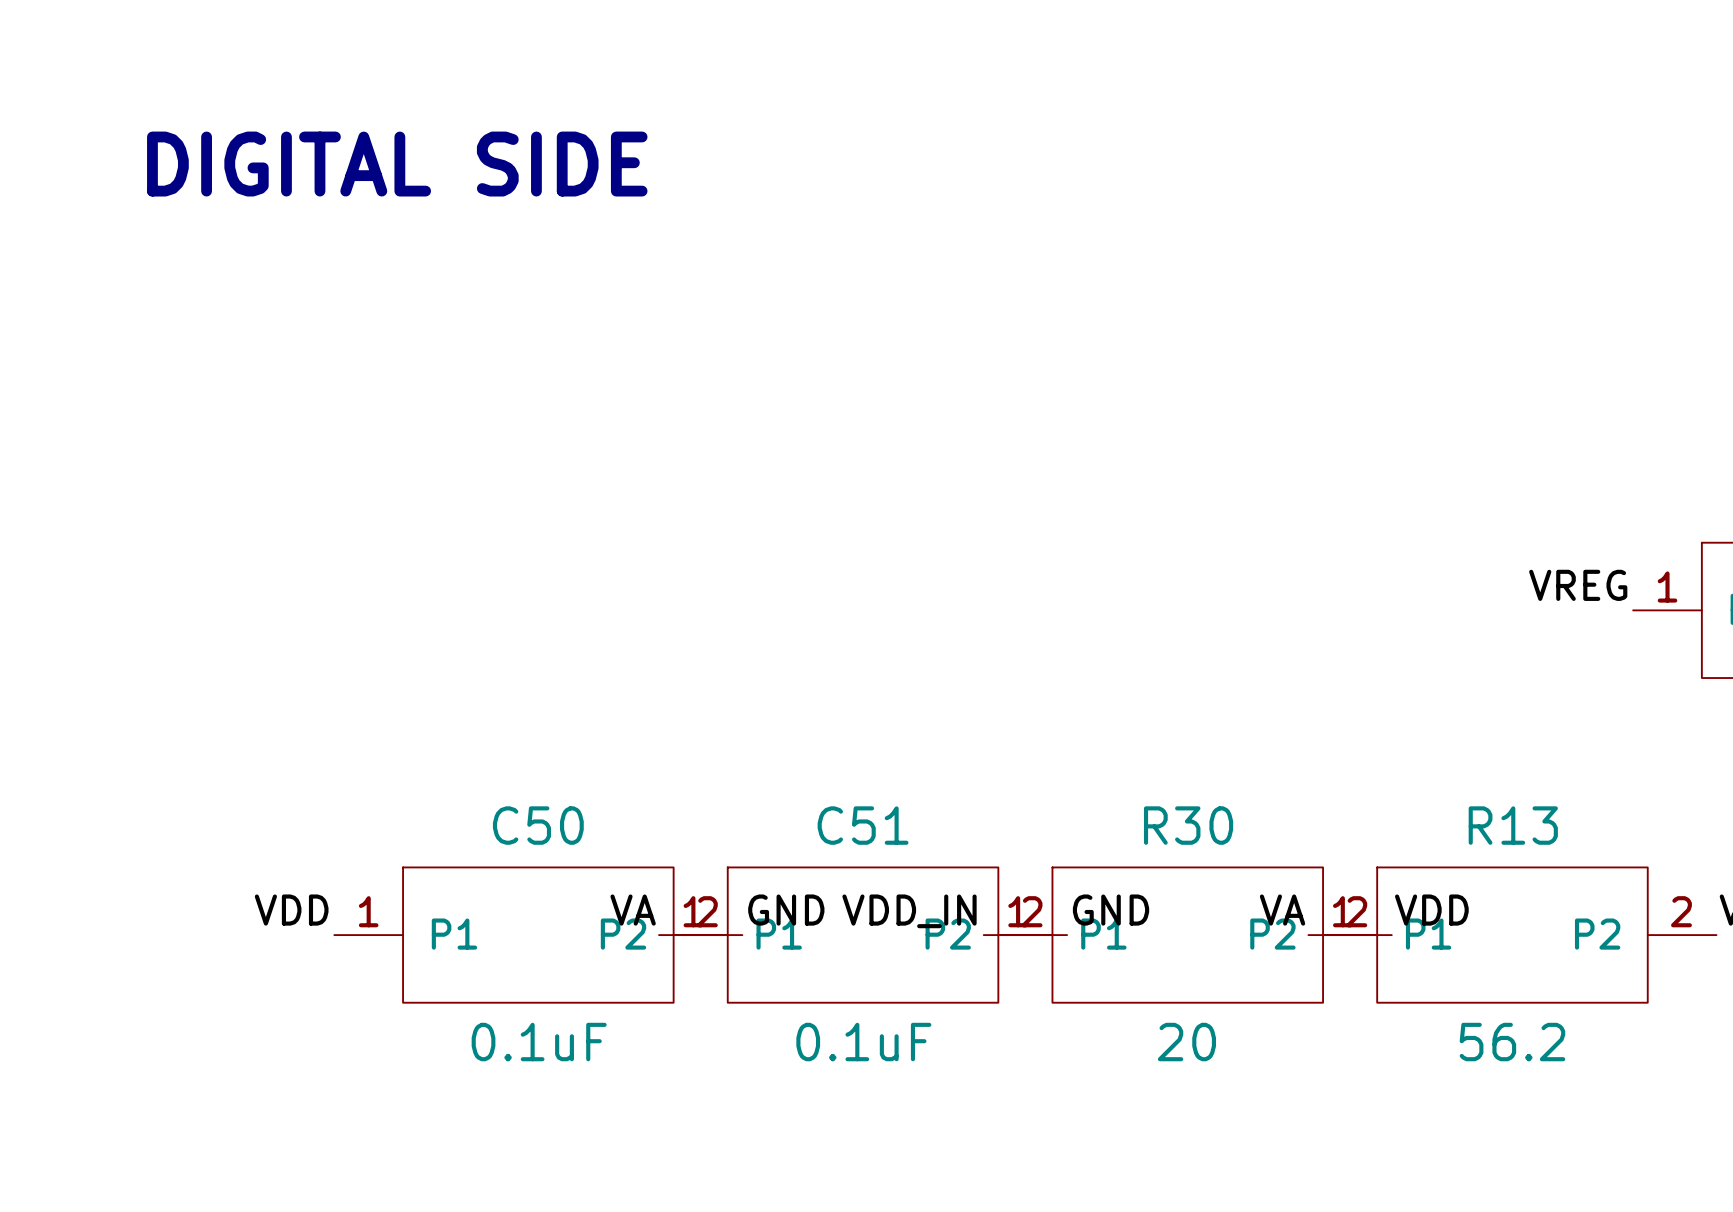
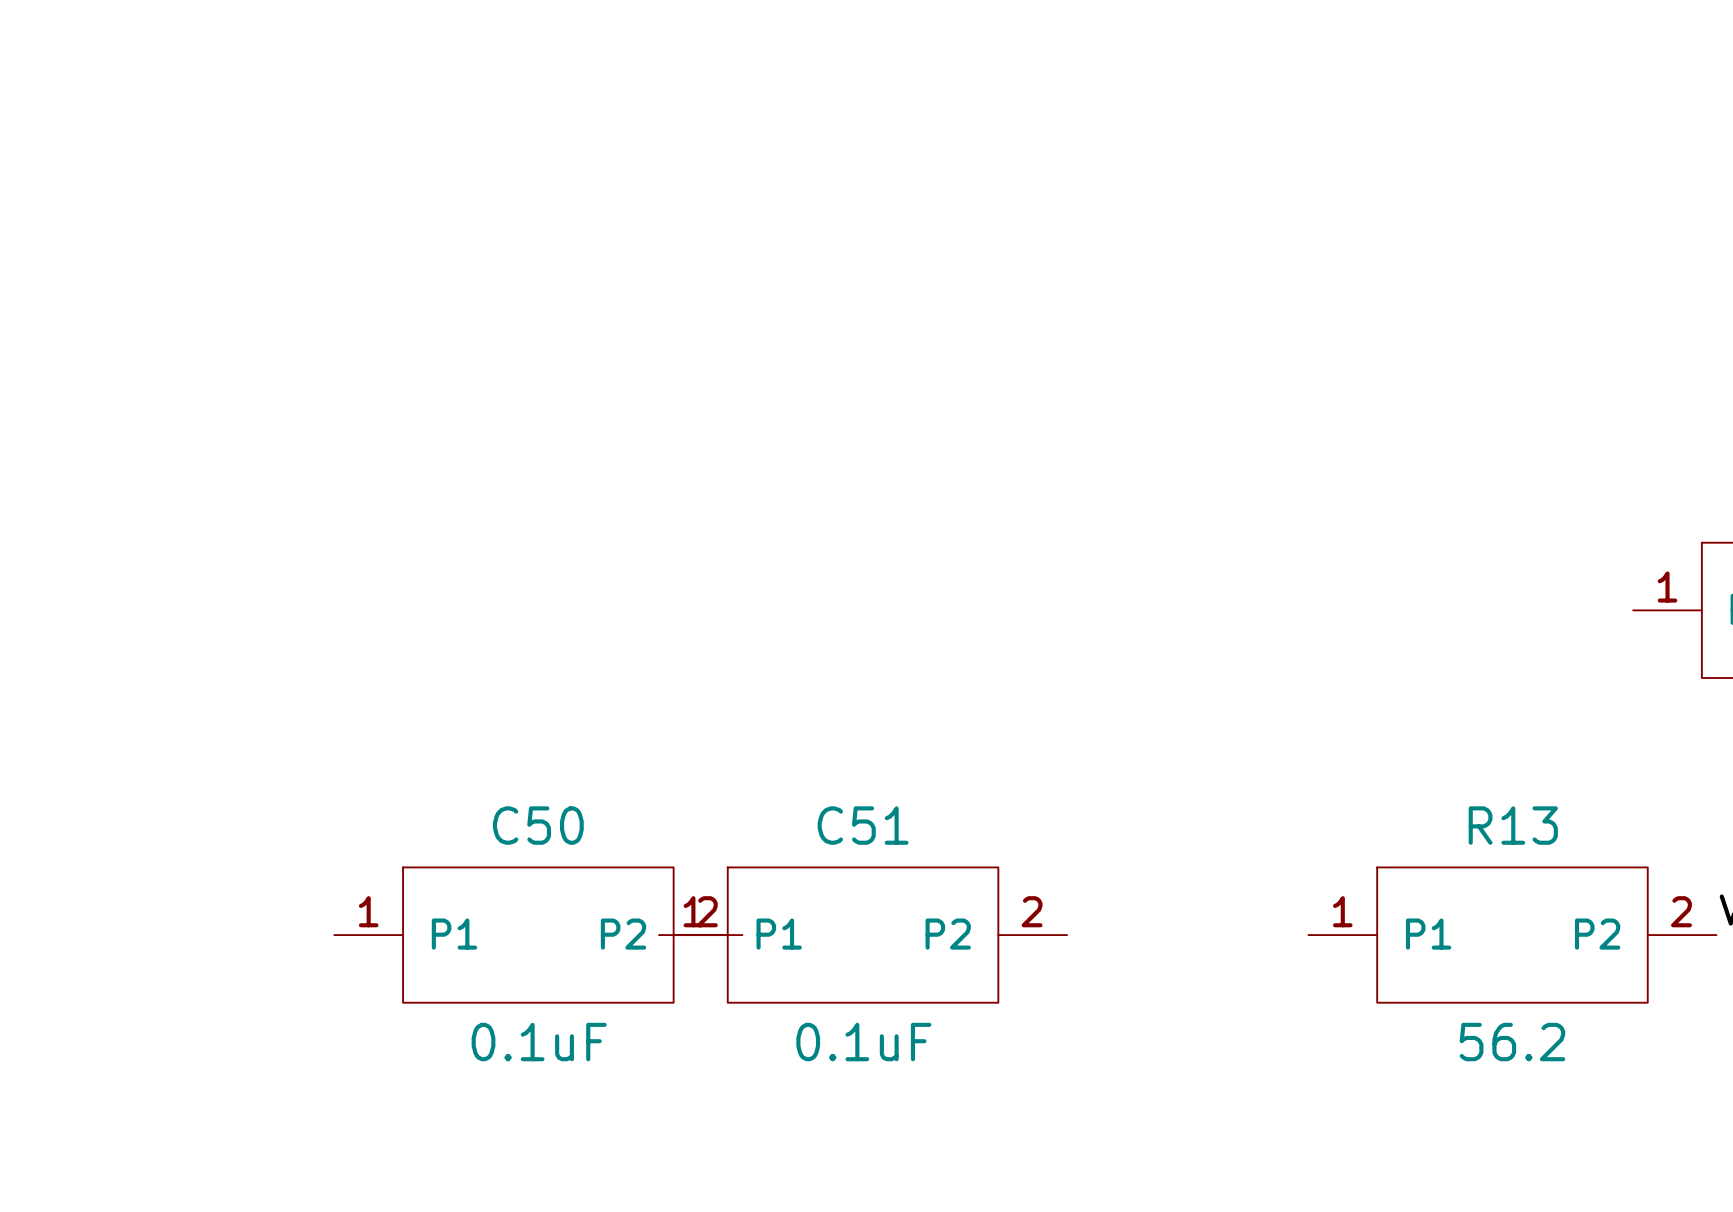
text: DIGITAL SIDE (397, 164) -> none
label: VREG (1578, 585) -> none
label: VDD (291, 910) -> none
label: VA (633, 910) -> none
label: GND (786, 910) -> none
label: GND (1111, 910) -> none
label: VA (1282, 910) -> none
label: VDD (1431, 910) -> none
label: VDD_IN (909, 911) -> none
R30: 20 (1187, 935) -> none

